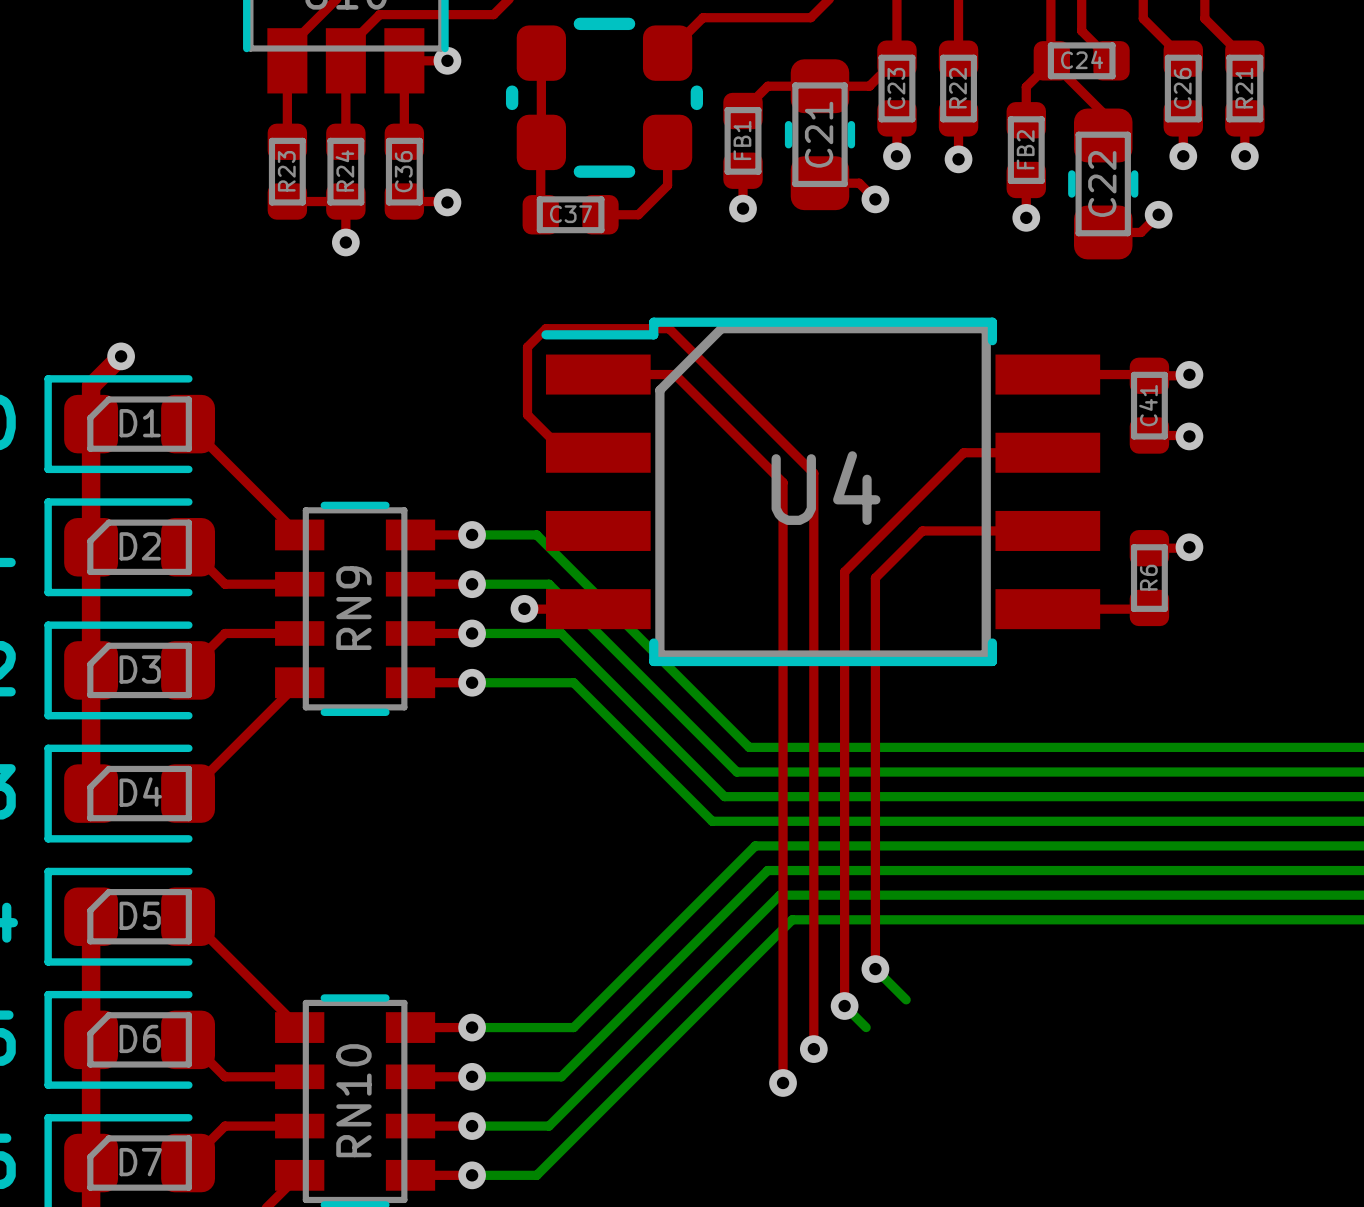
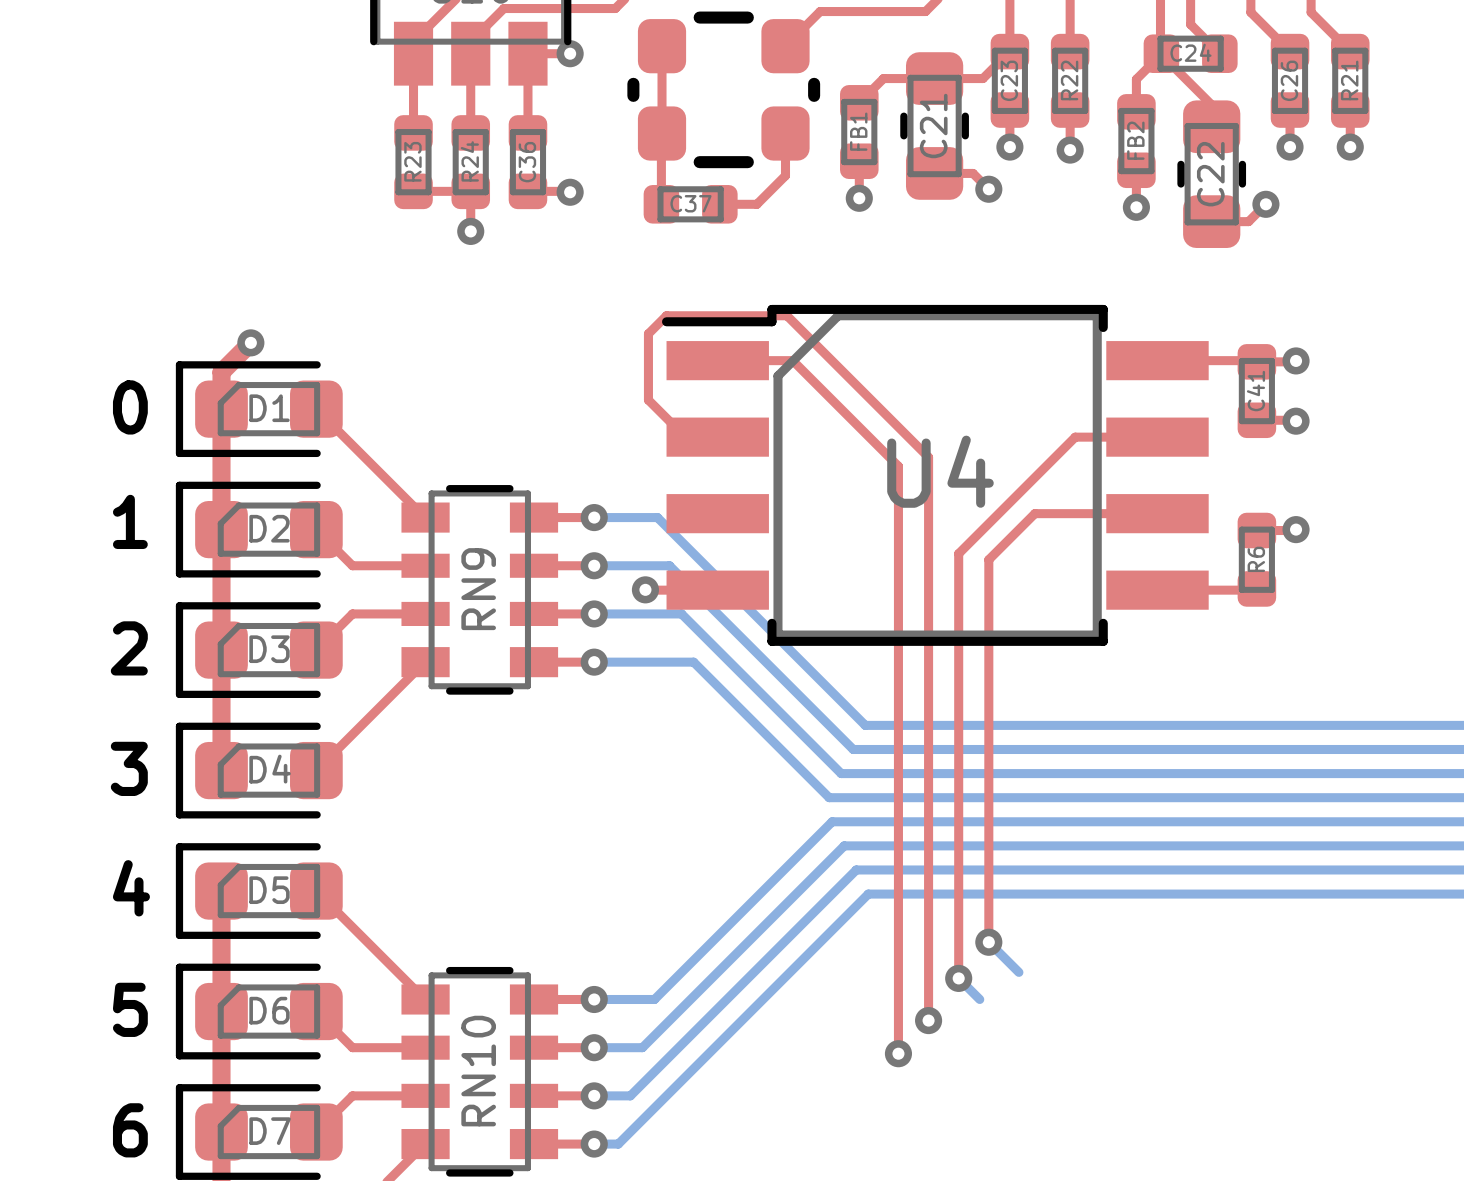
bottom track: (755, 845) (573, 1027) (533, 1027) -> (871, 821) (832, 821) (654, 999)
bottom track: (767, 870) (561, 1076) (521, 1076) -> (883, 845) (844, 845) (642, 1047)
bottom track: (779, 895) (549, 1126) (509, 1126) -> (895, 869) (856, 869) (630, 1095)
bottom track: (792, 919) (536, 1175) (496, 1175) -> (907, 894) (868, 894) (618, 1144)

